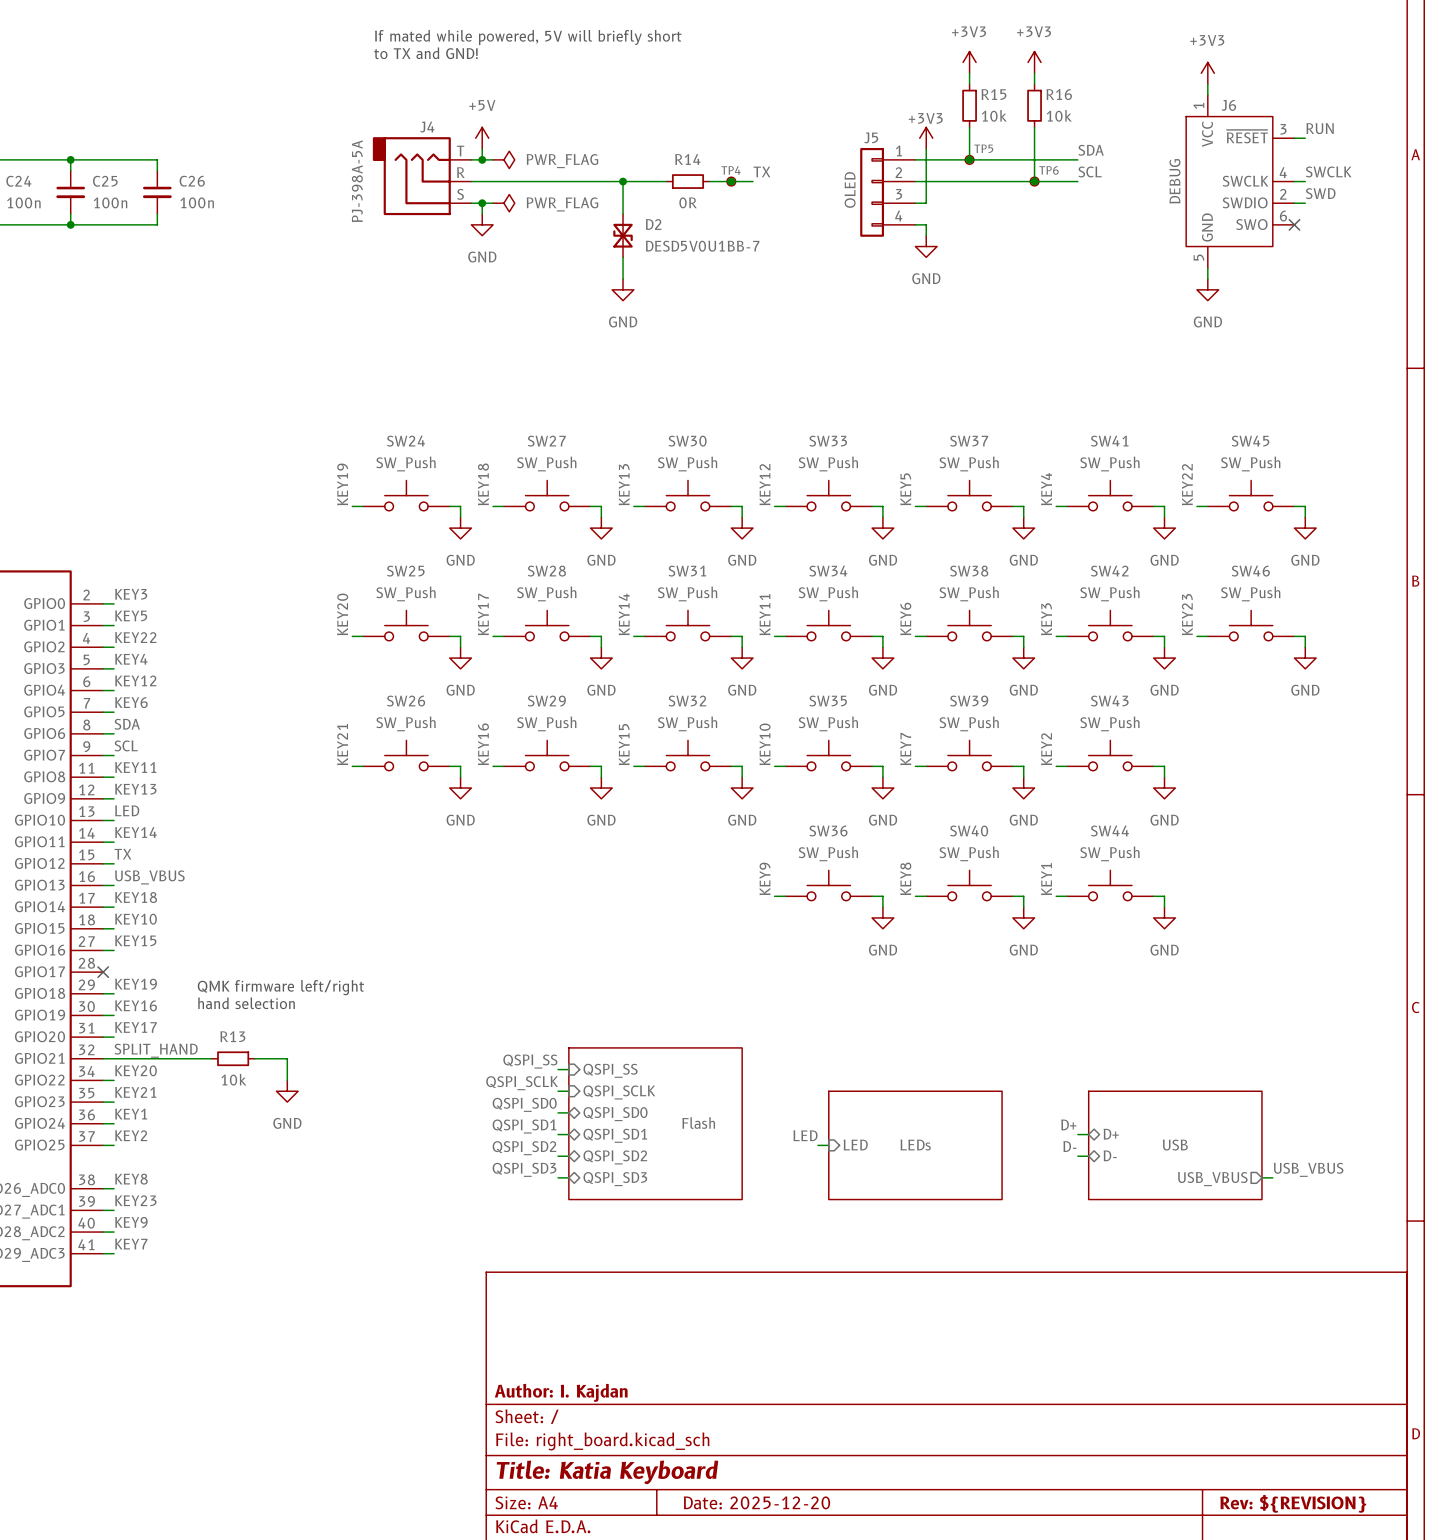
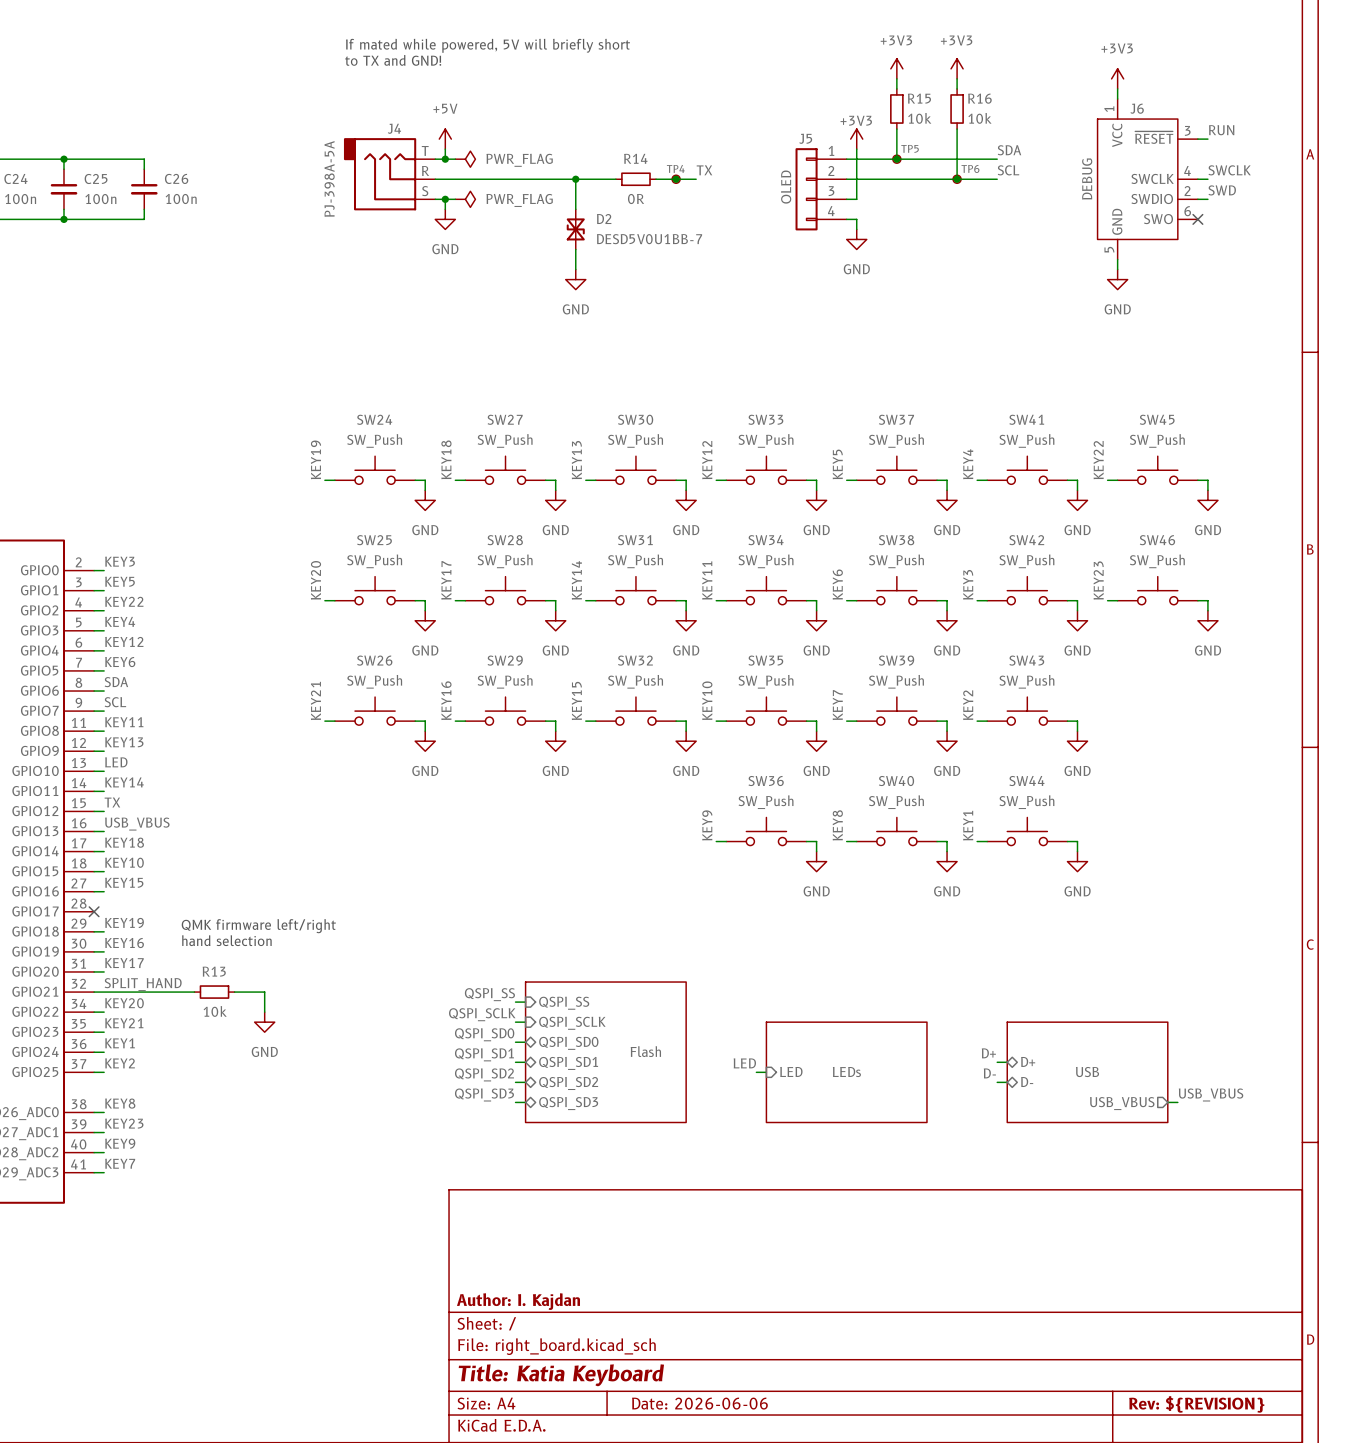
title block: Date: 2025-12-20 (756, 1502) -> Date: 2026-06-06 (699, 1403)

